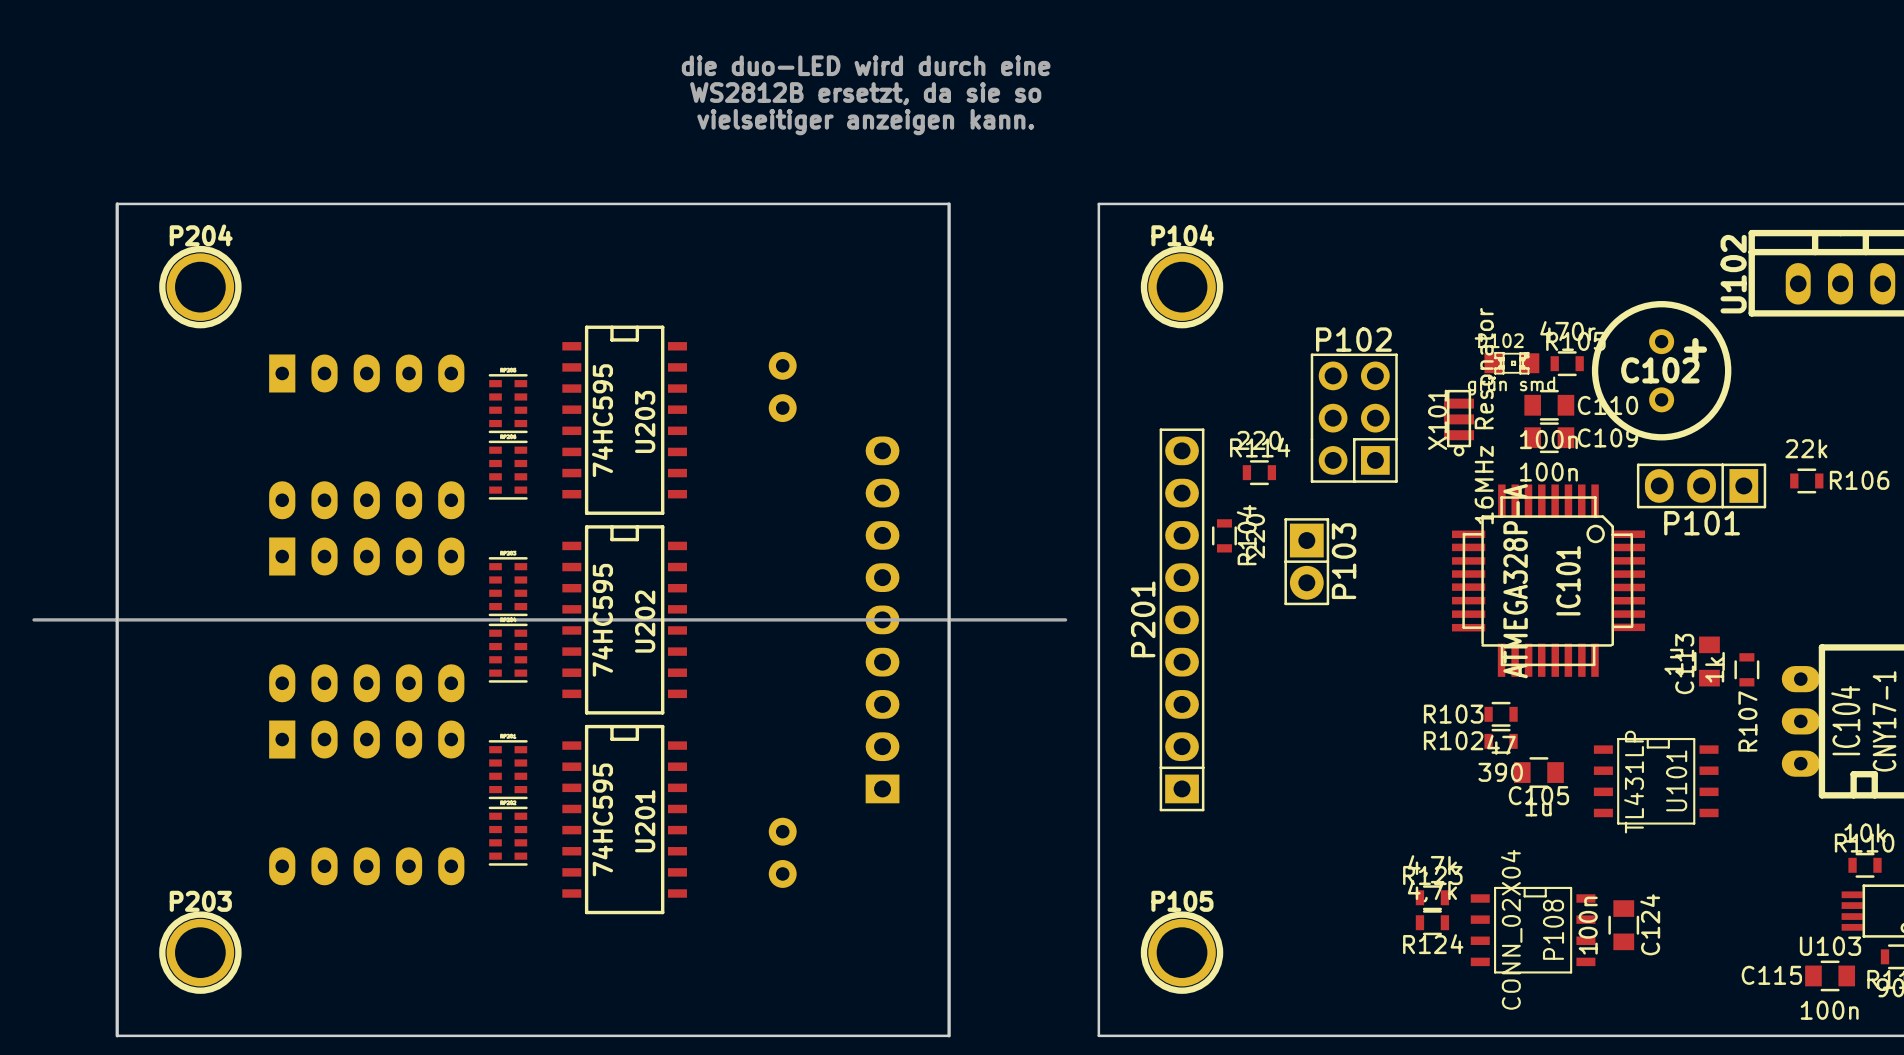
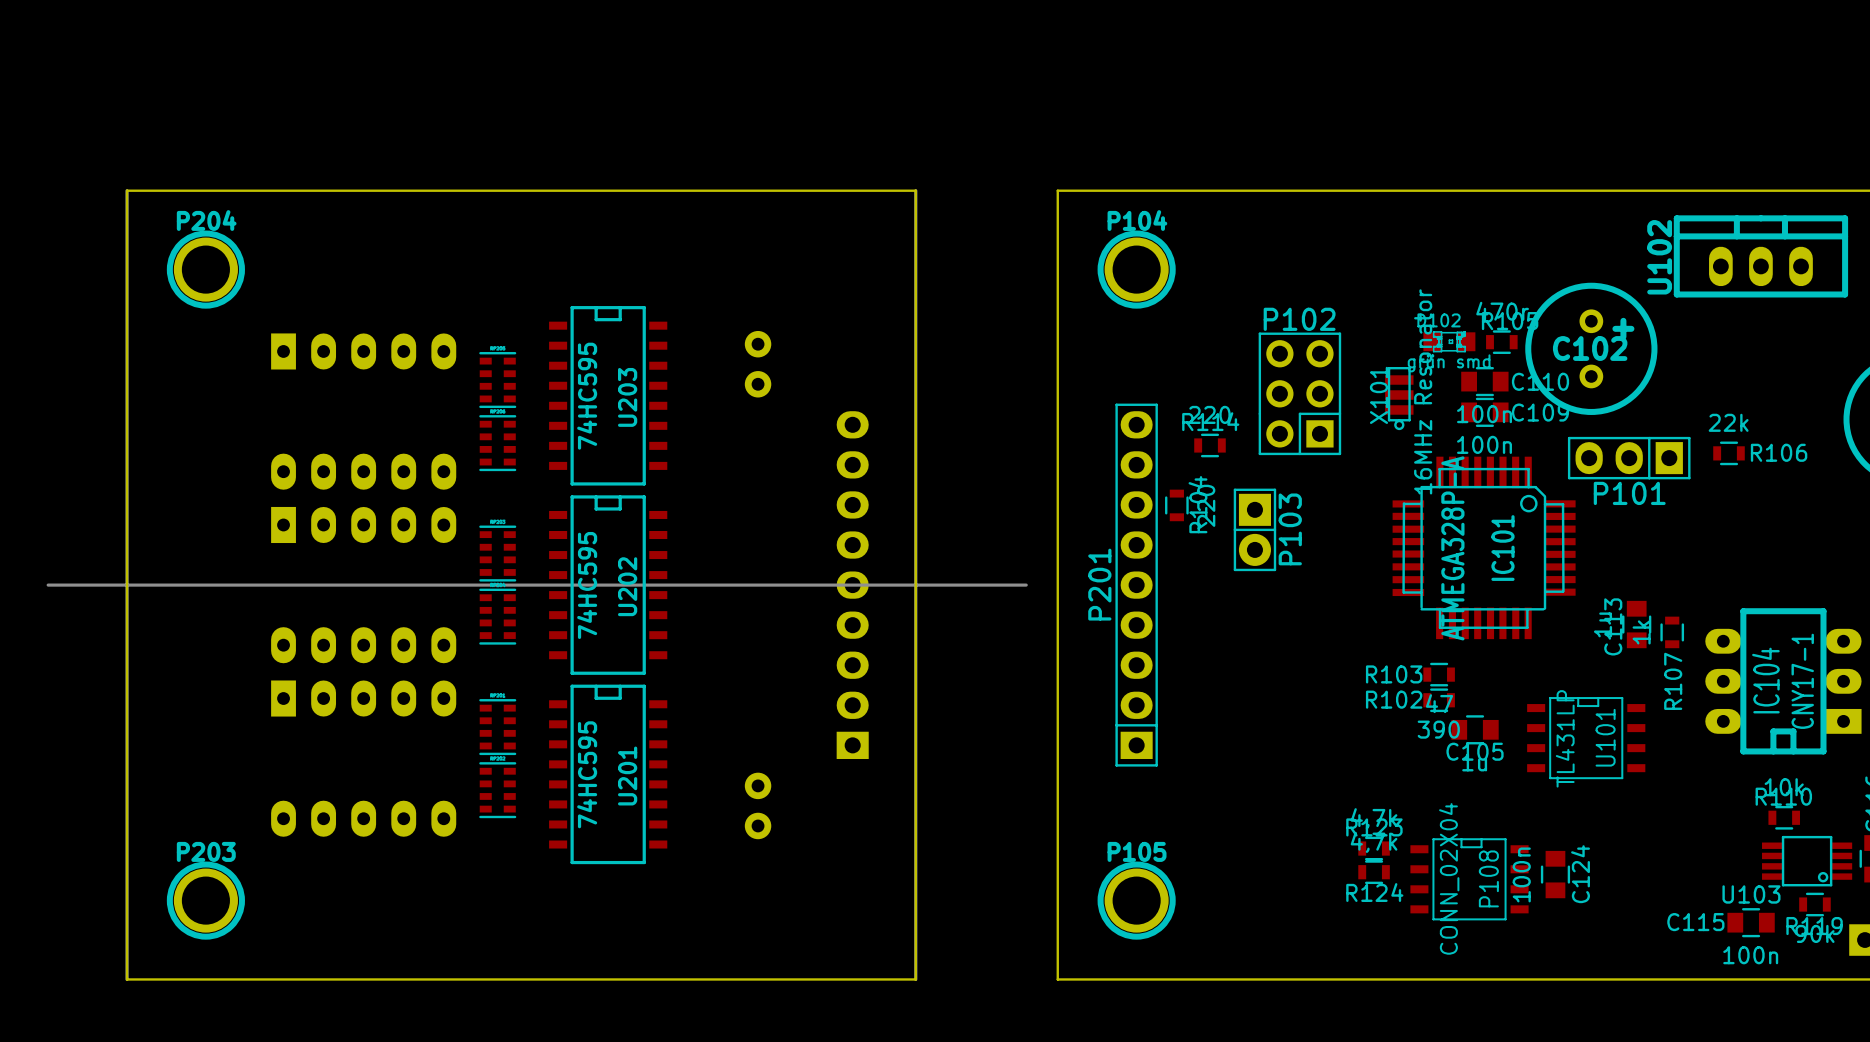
text: die duo-LED wird durch eine (866, 65) -> none
text: WS2812B ersetzt, da sie so (865, 93) -> none
text: vielseitiger anzeigen kann. (865, 122) -> none

